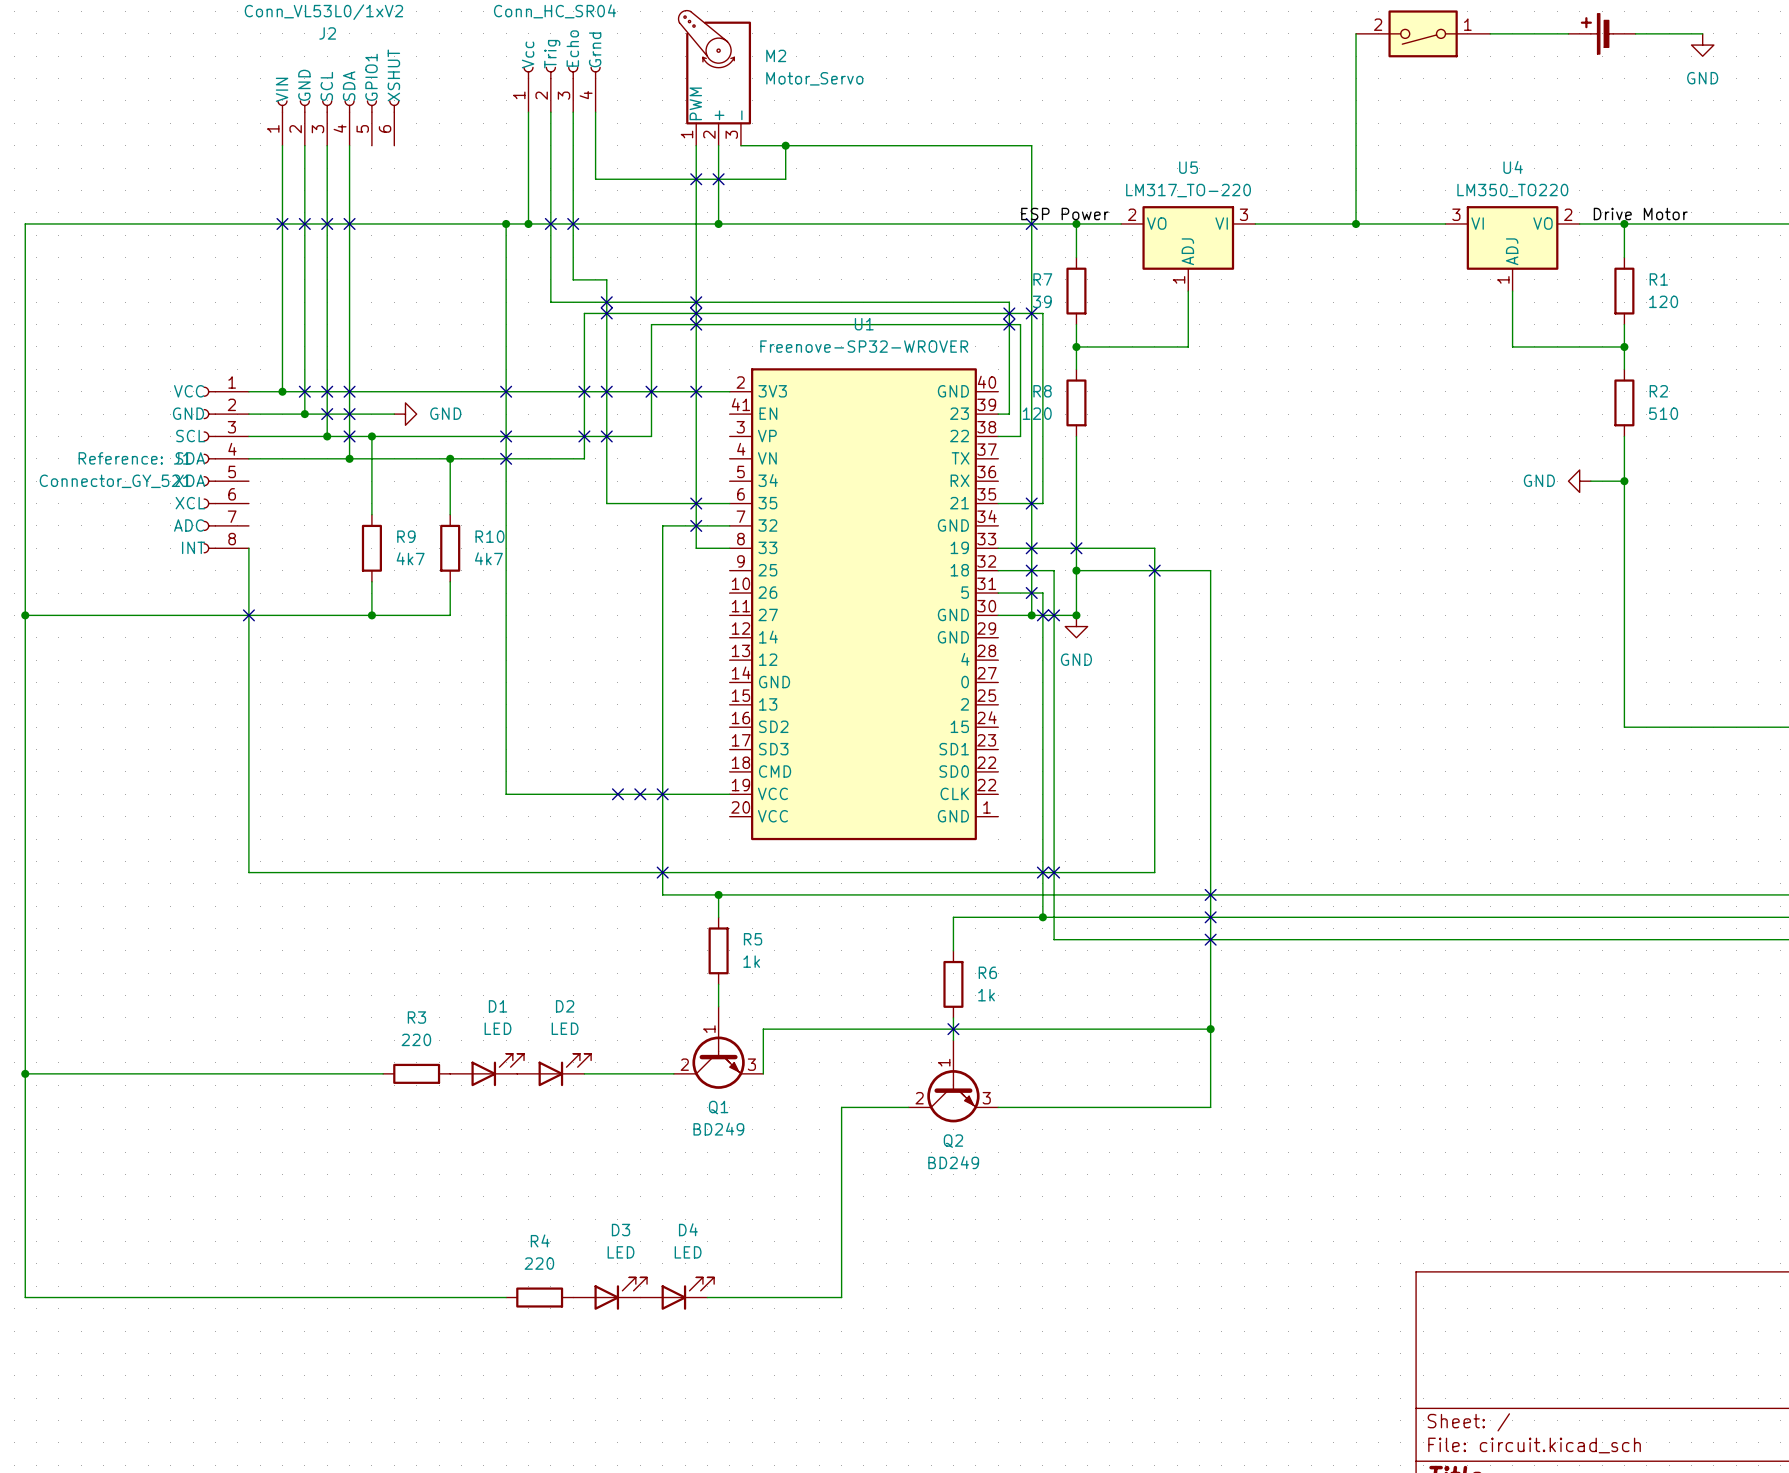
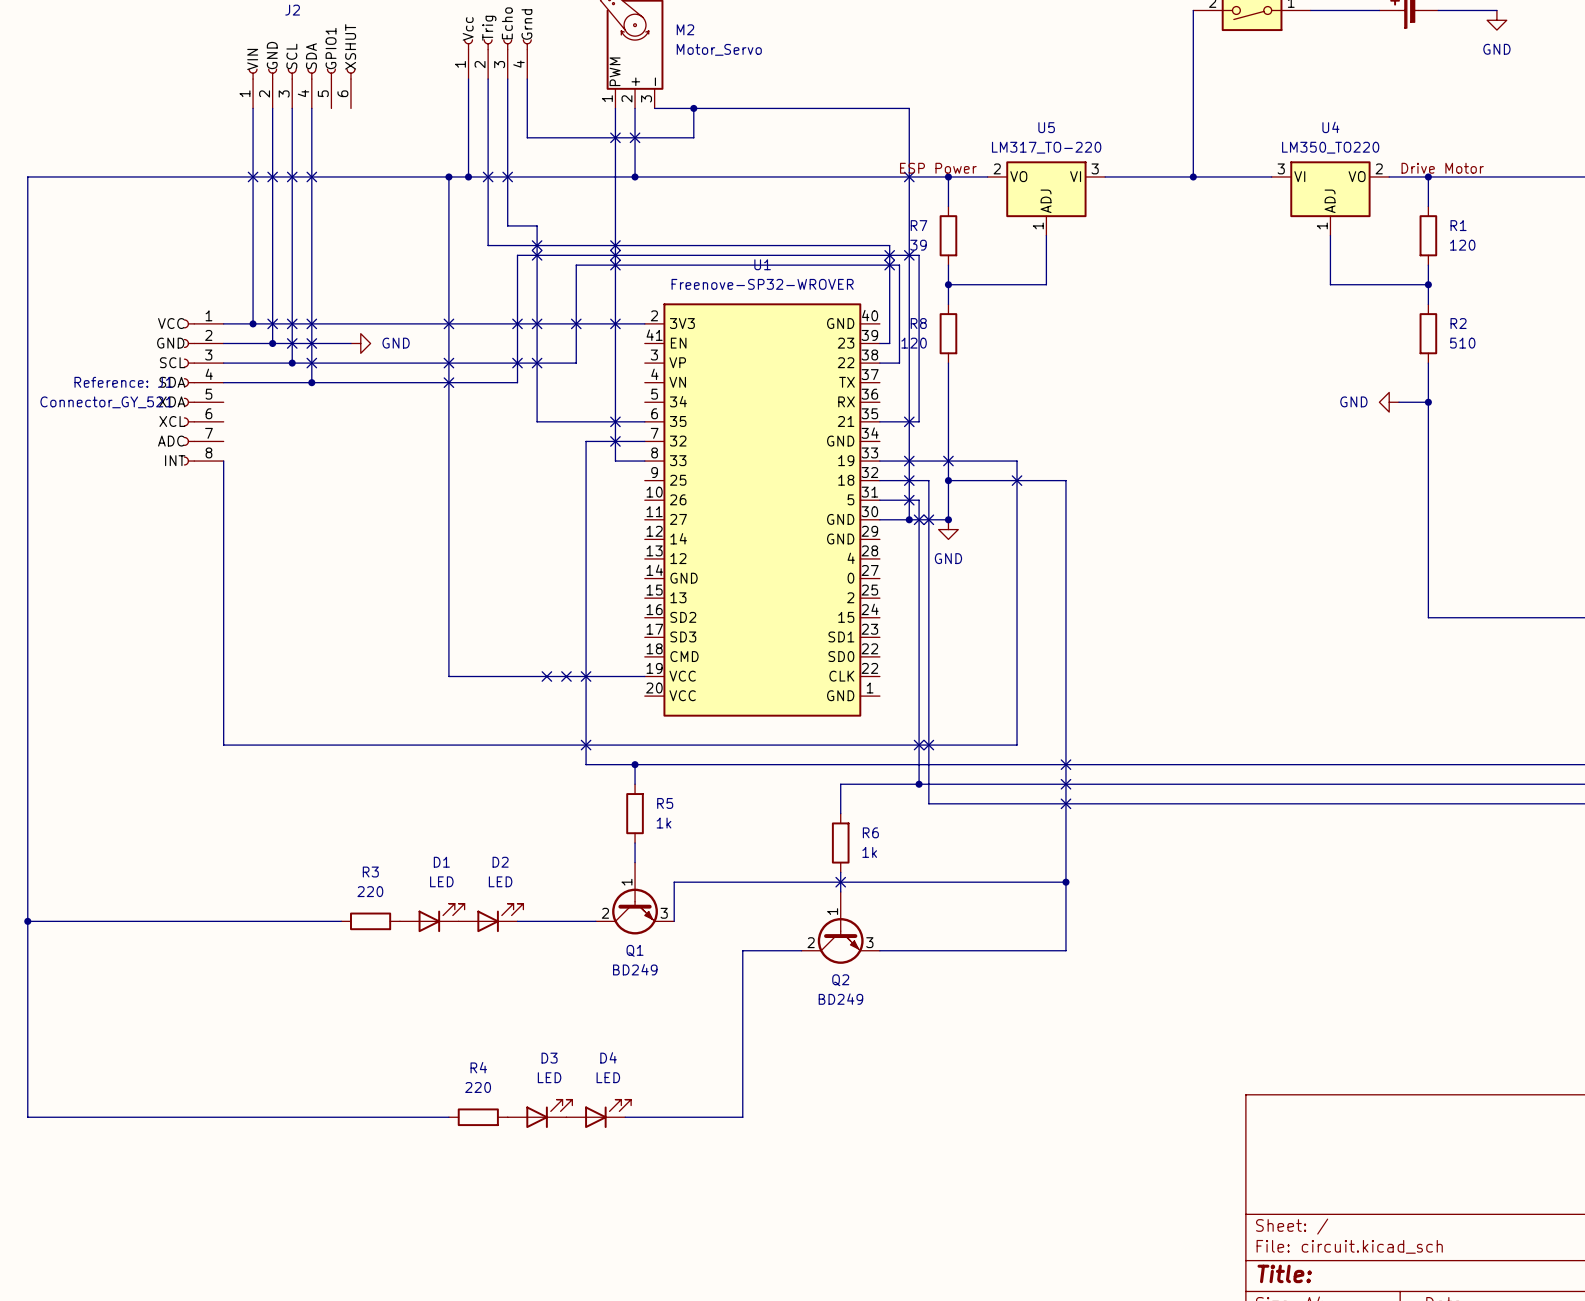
wire: (371, 436) (371, 514) -> none
junction: (371, 436) -> none
wire: (450, 458) (450, 514) -> none
junction: (450, 458) -> none
R9: 4k7 (371, 548) -> none
R10: 4k7 (450, 548) -> none
wire: (371, 581) (371, 615) -> none
wire: (450, 581) (450, 615) (25, 615) -> none
junction: (25, 615) -> none
no-connect mark: (248, 615) -> none
junction: (371, 615) -> none

